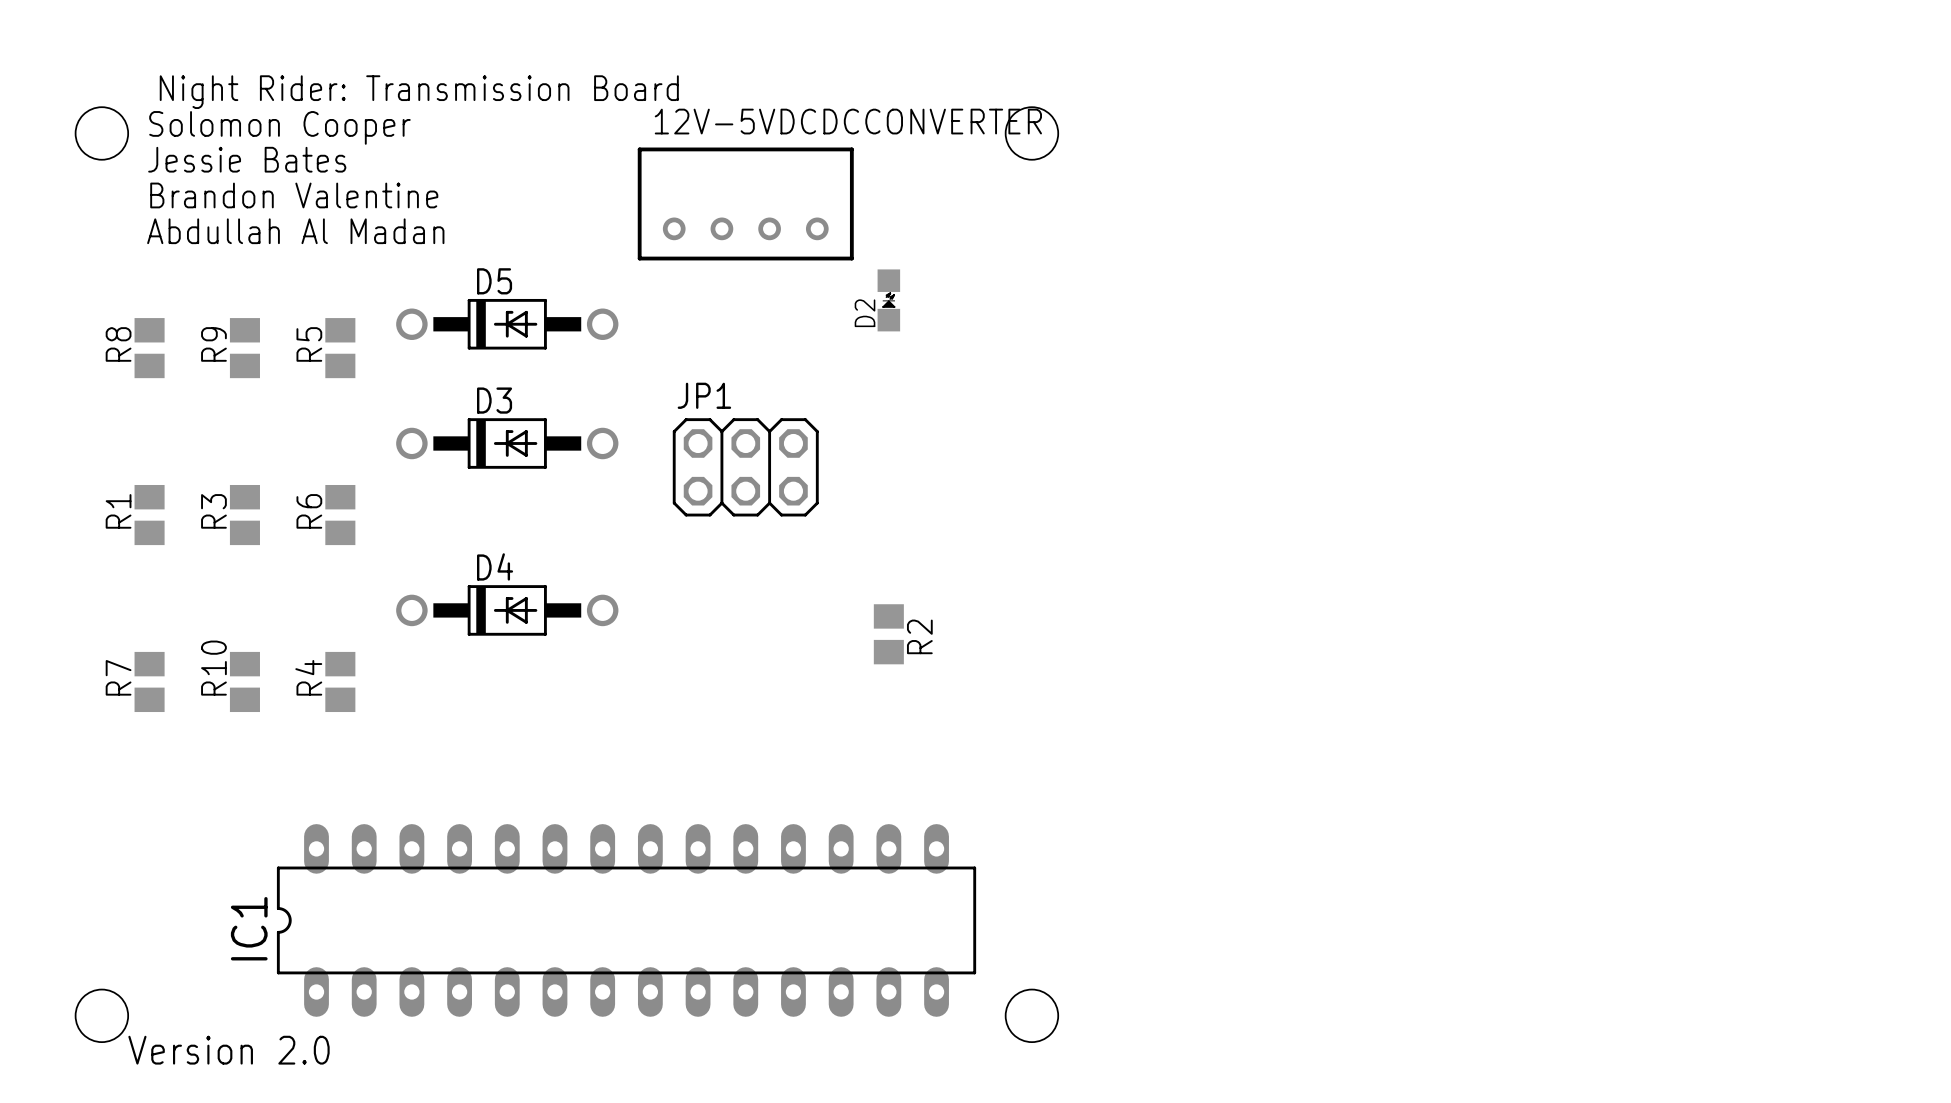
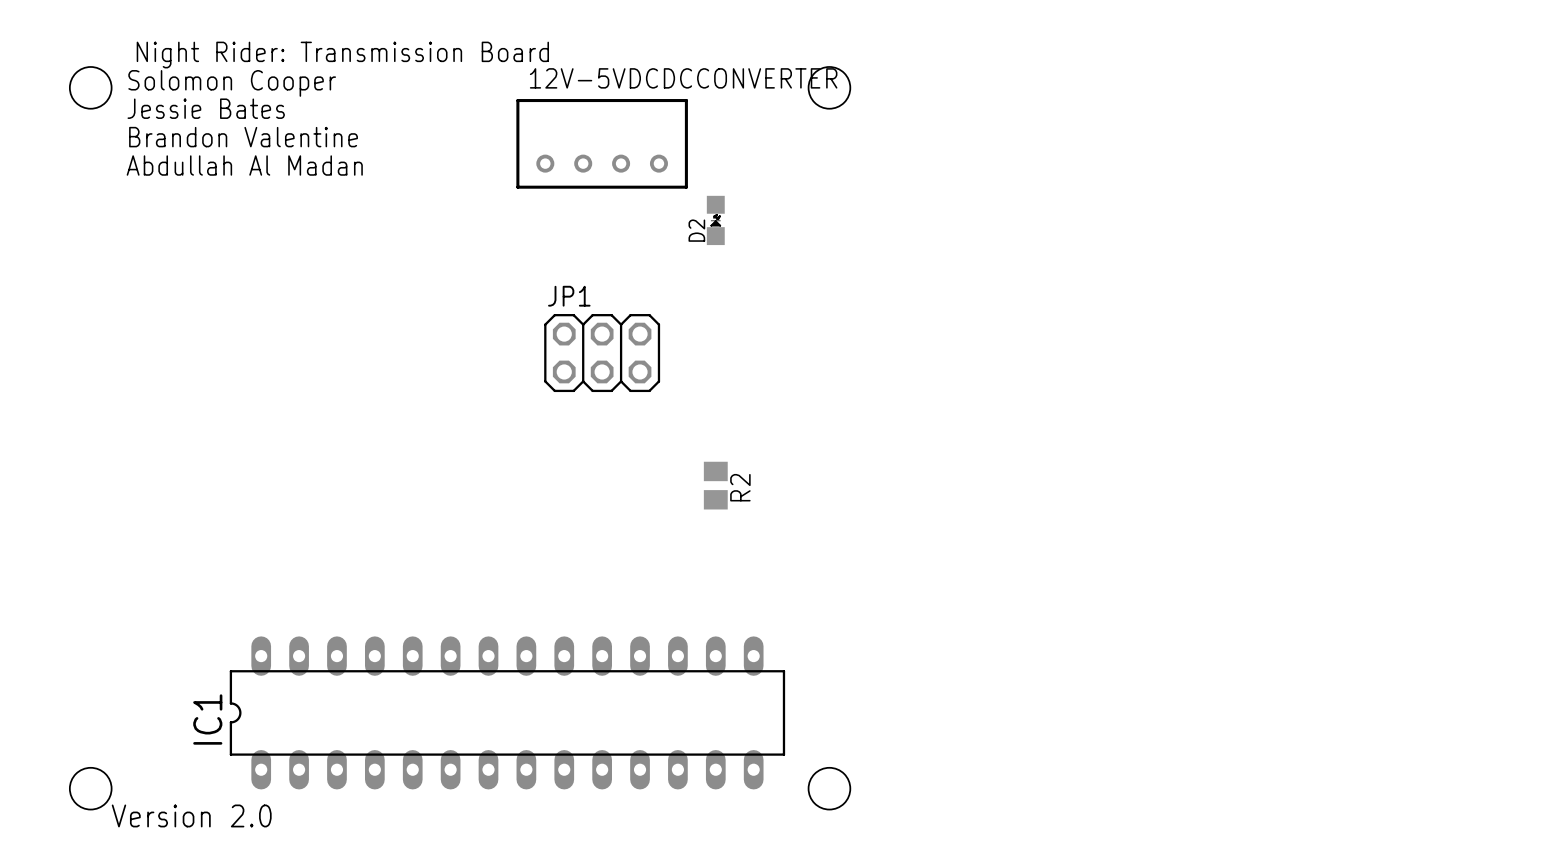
D5: (507, 324) -> none
R8: (149, 348) -> none
R9: (244, 348) -> none
R5: (340, 348) -> none
D3: (507, 443) -> none
R1: (149, 515) -> none
R3: (244, 515) -> none
R6: (340, 515) -> none
D4: (507, 610) -> none
R7: (149, 681) -> none
R10: (244, 681) -> none
R4: (340, 681) -> none

